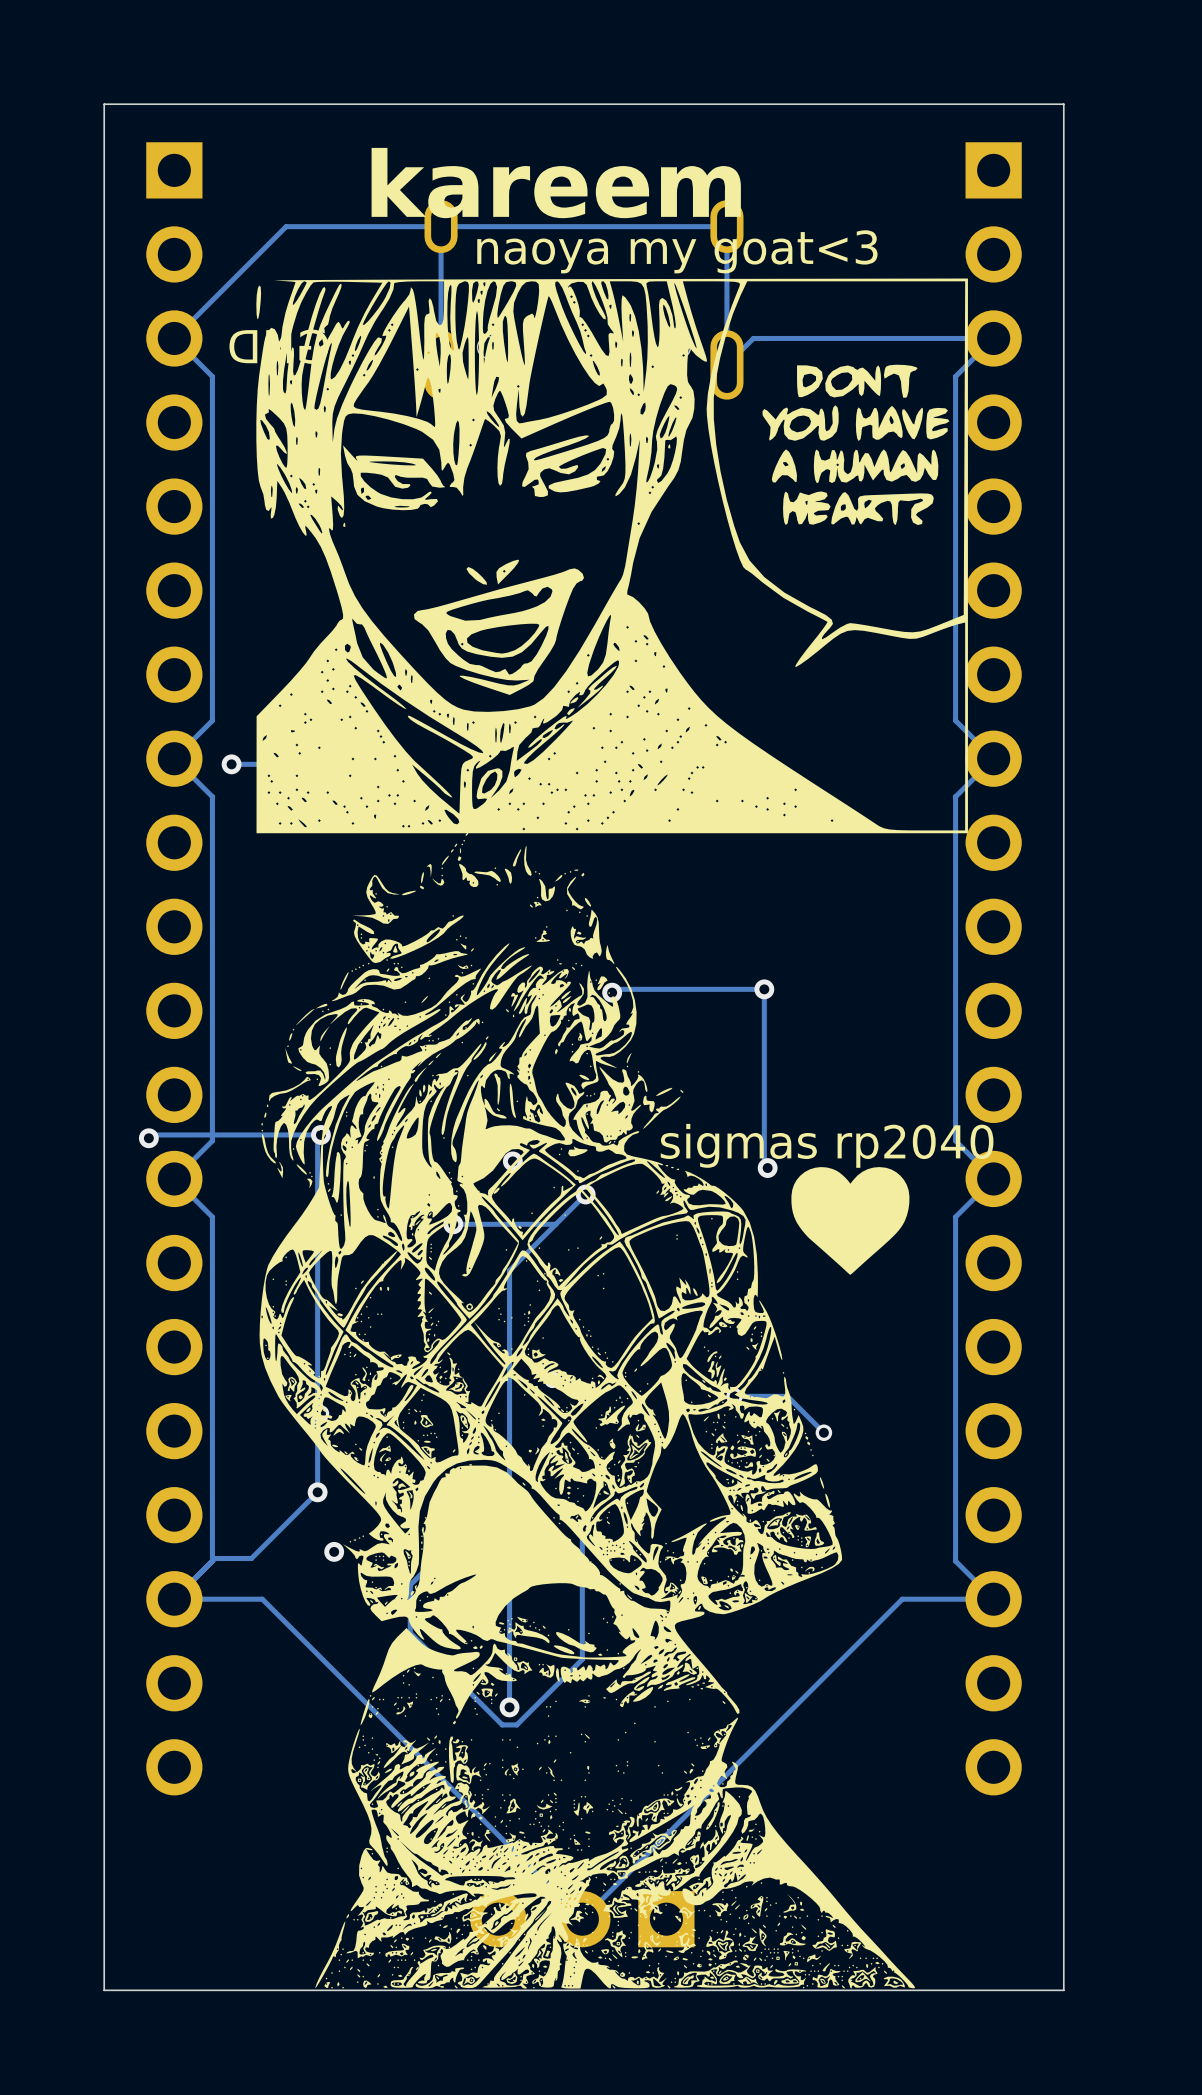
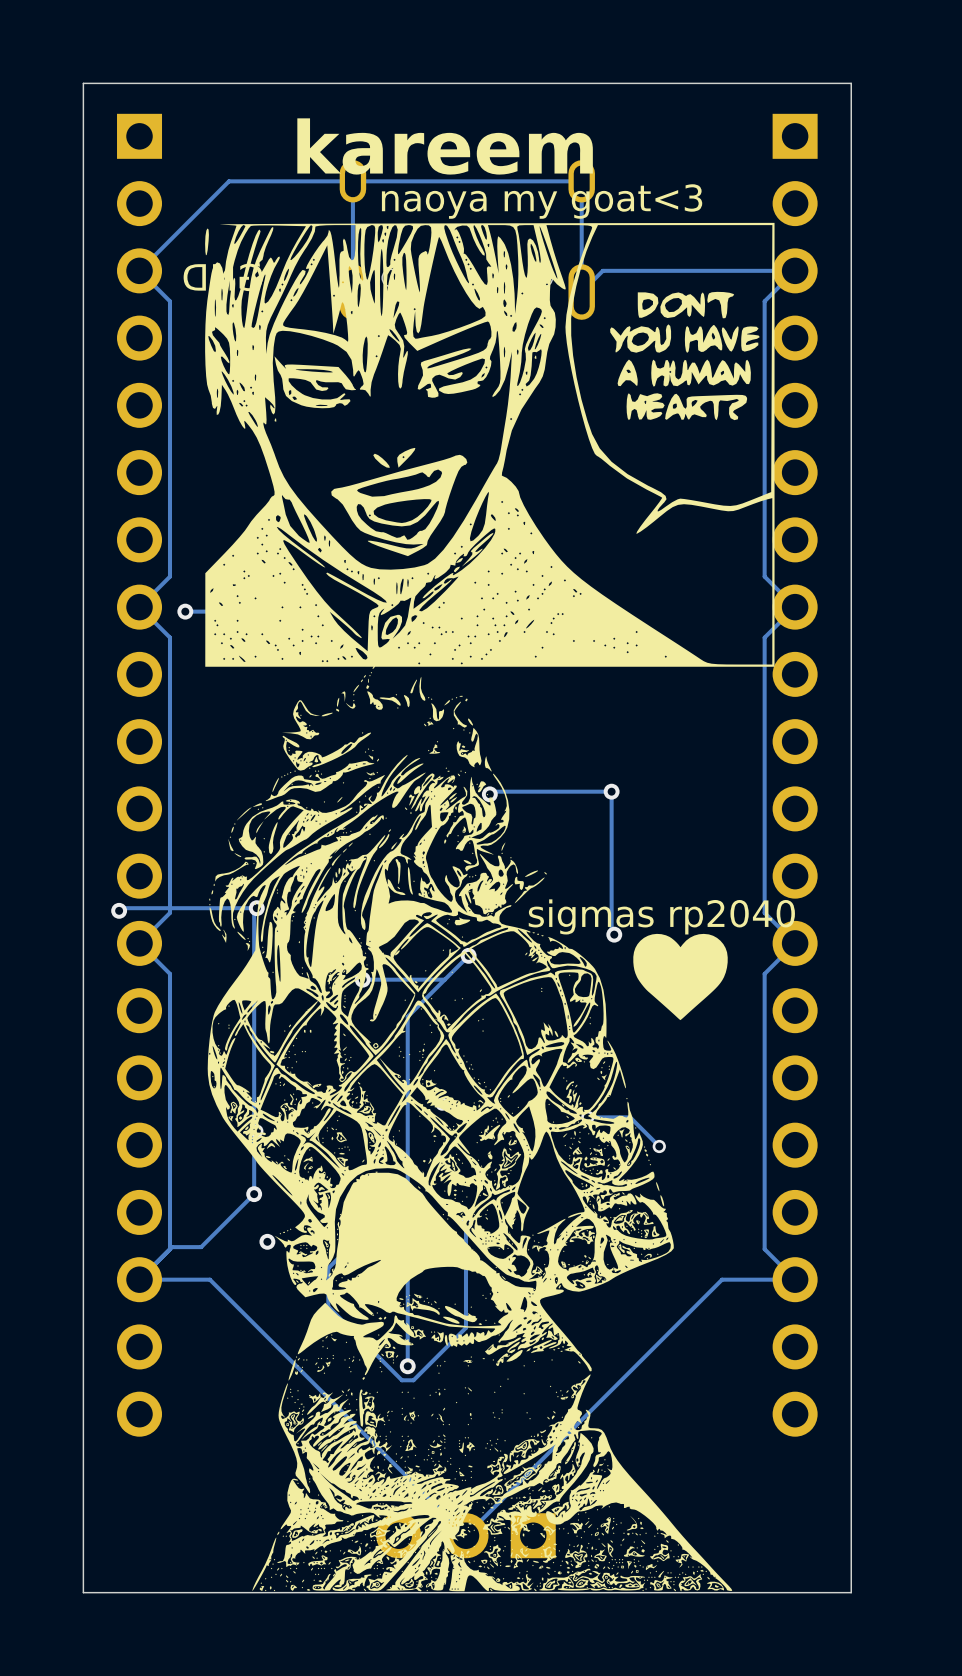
via: (512, 1161) -> none

